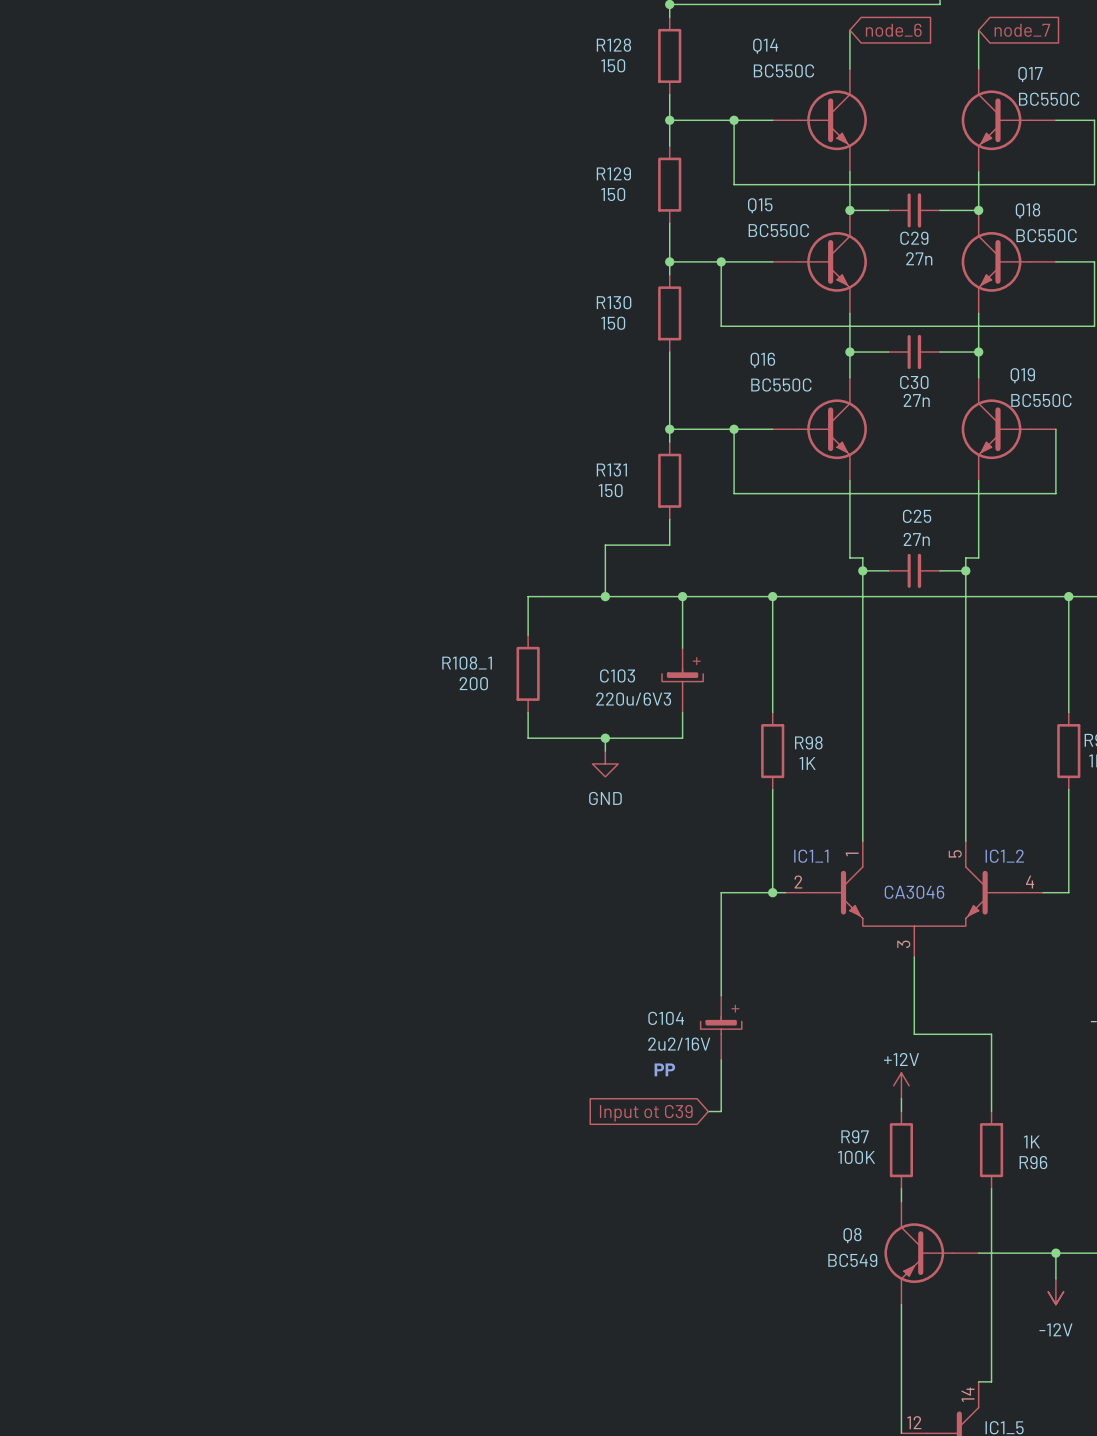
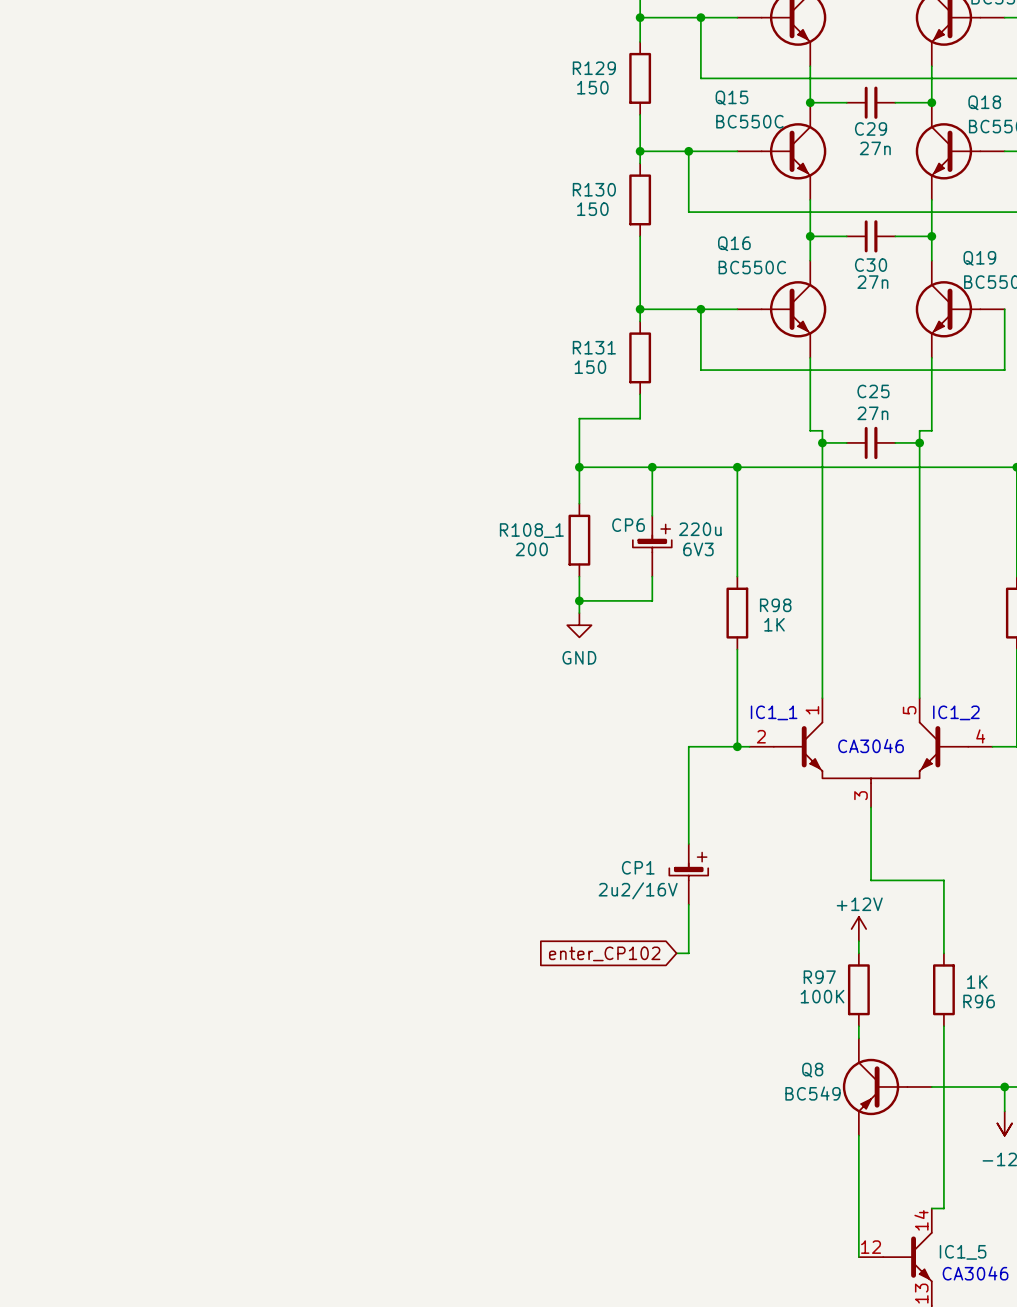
wire: (605, 596) (528, 596) (528, 635) -> (579, 467) (579, 503)
R108_1 position: (528, 673) -> (579, 540)
C103 name: C103 (617, 675) -> CP6 (628, 525)
C103 text: none -> 6V3 (698, 549)
C103 value: 220u/6V3 (633, 699) -> 220u (700, 529)
wire: (528, 712) (528, 738) (605, 738) -> (579, 576) (579, 600)
C104 name: C104 (666, 1018) -> CP1 (638, 867)
text: PP (664, 1069) -> none
global label: Input ot C39 (646, 1113) -> enter_CP102 (604, 953)

